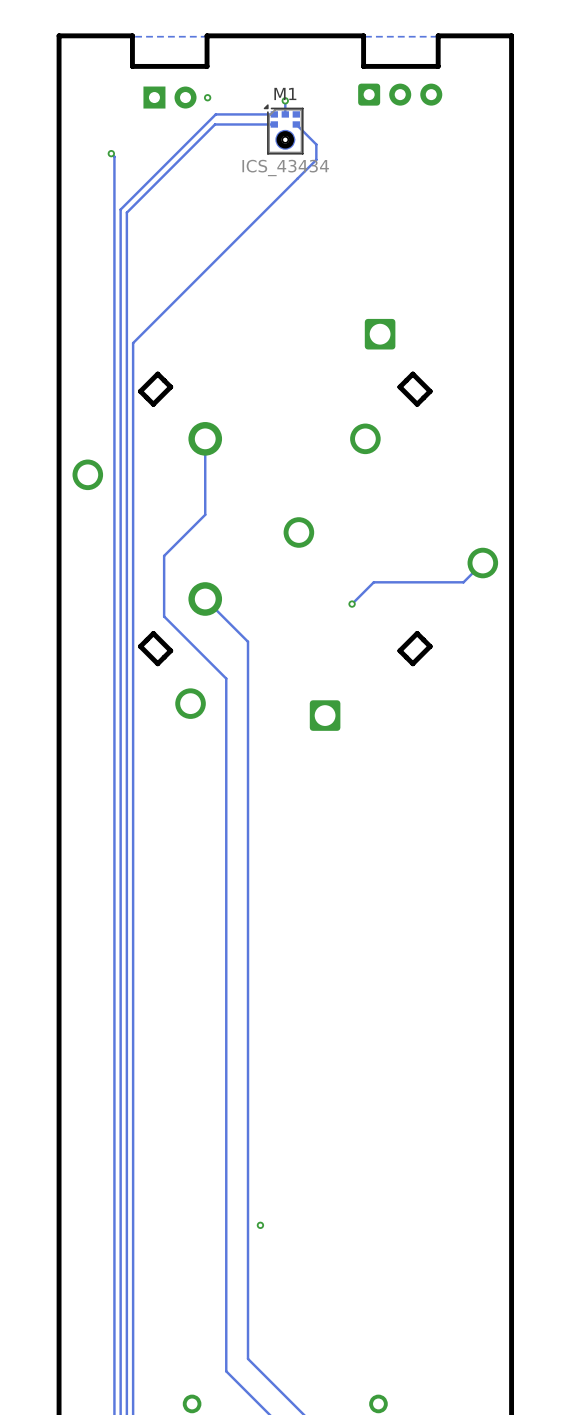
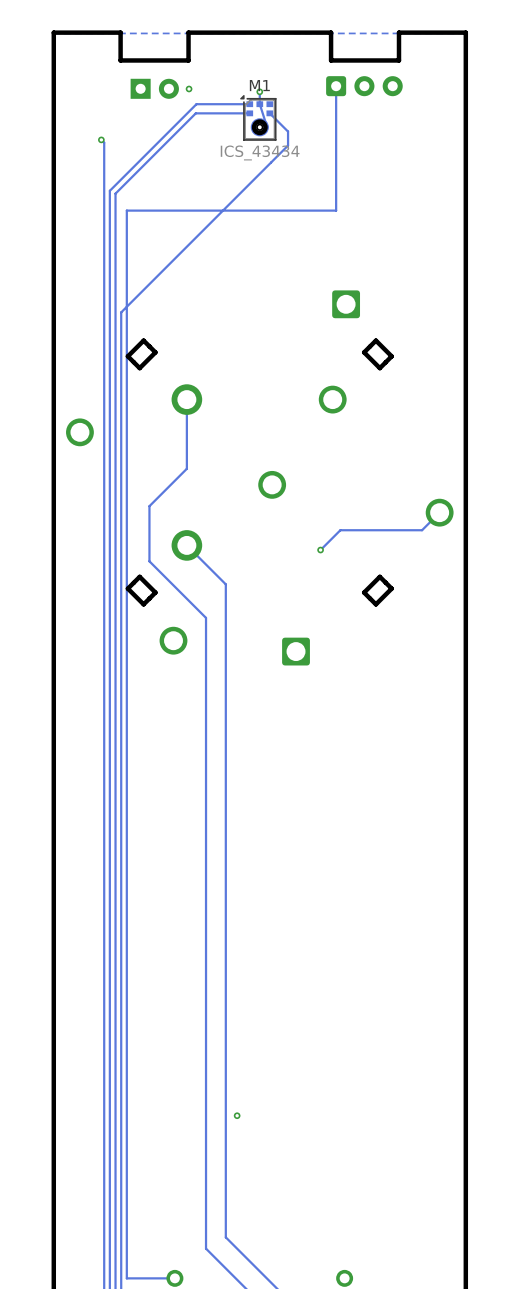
track: none -> (336, 86) (336, 210) (126, 210) (126, 1278) (174, 1278)
track: none -> (259, 104) (267, 127)

